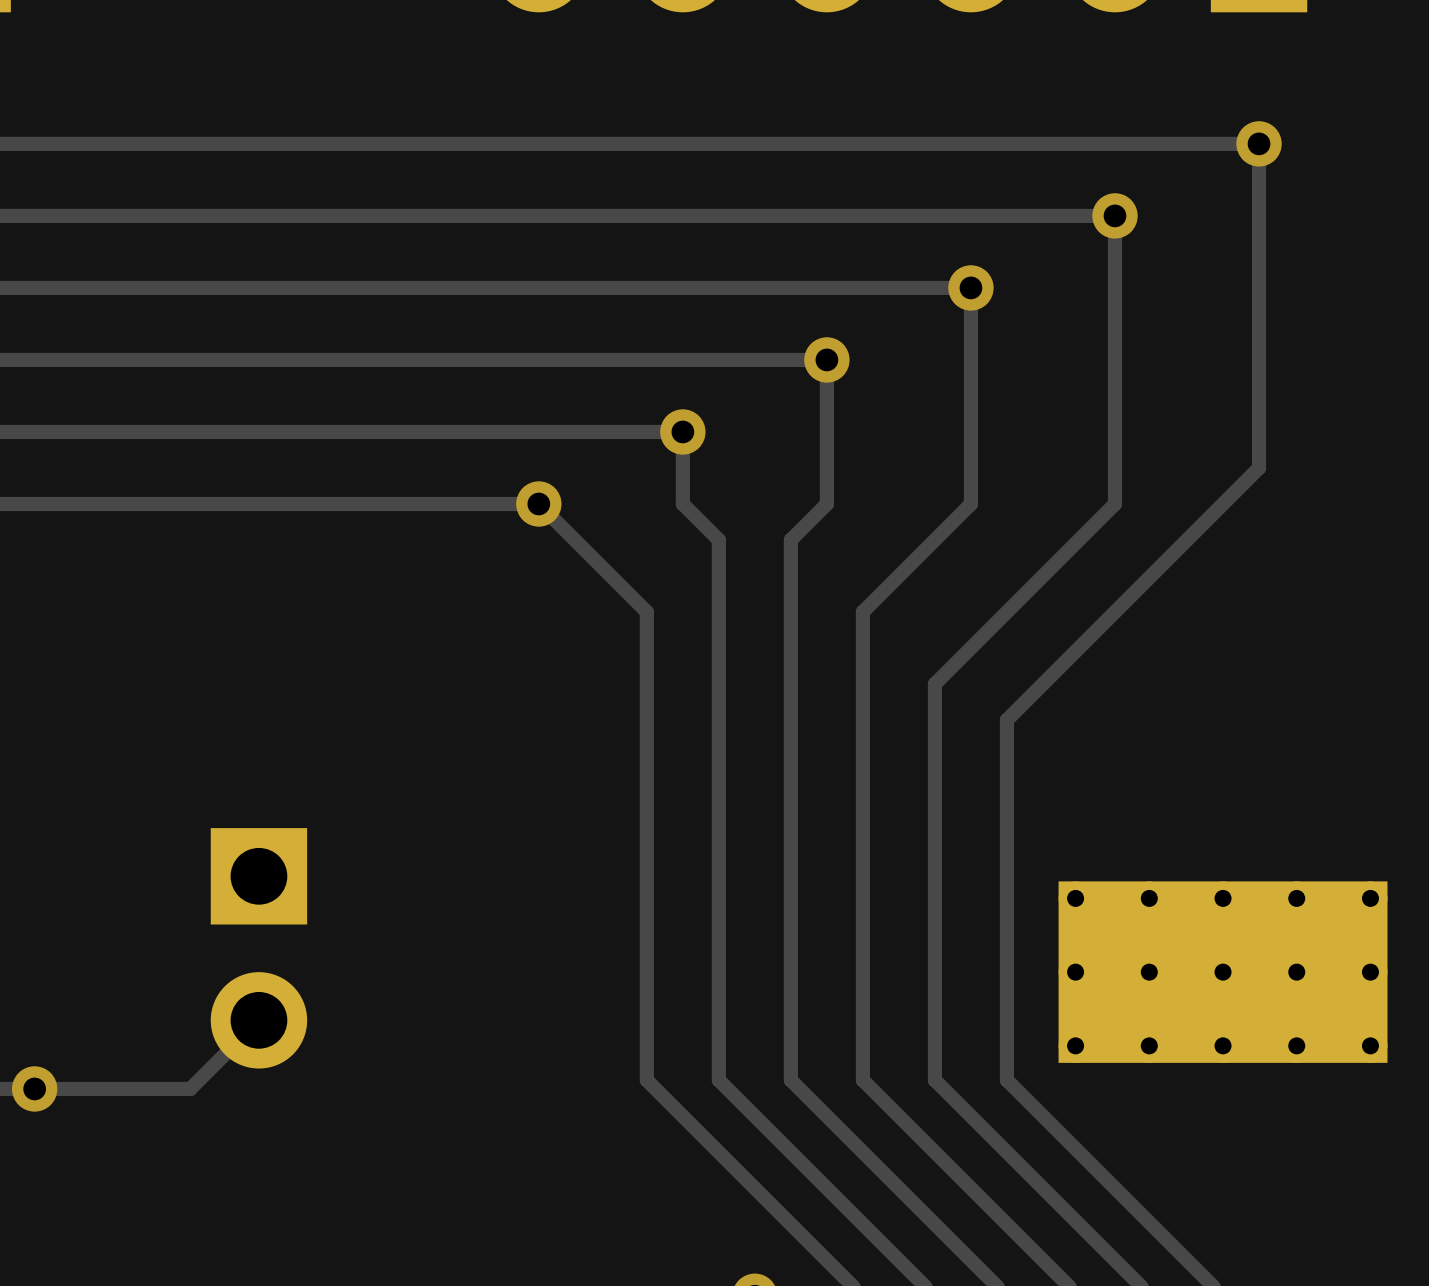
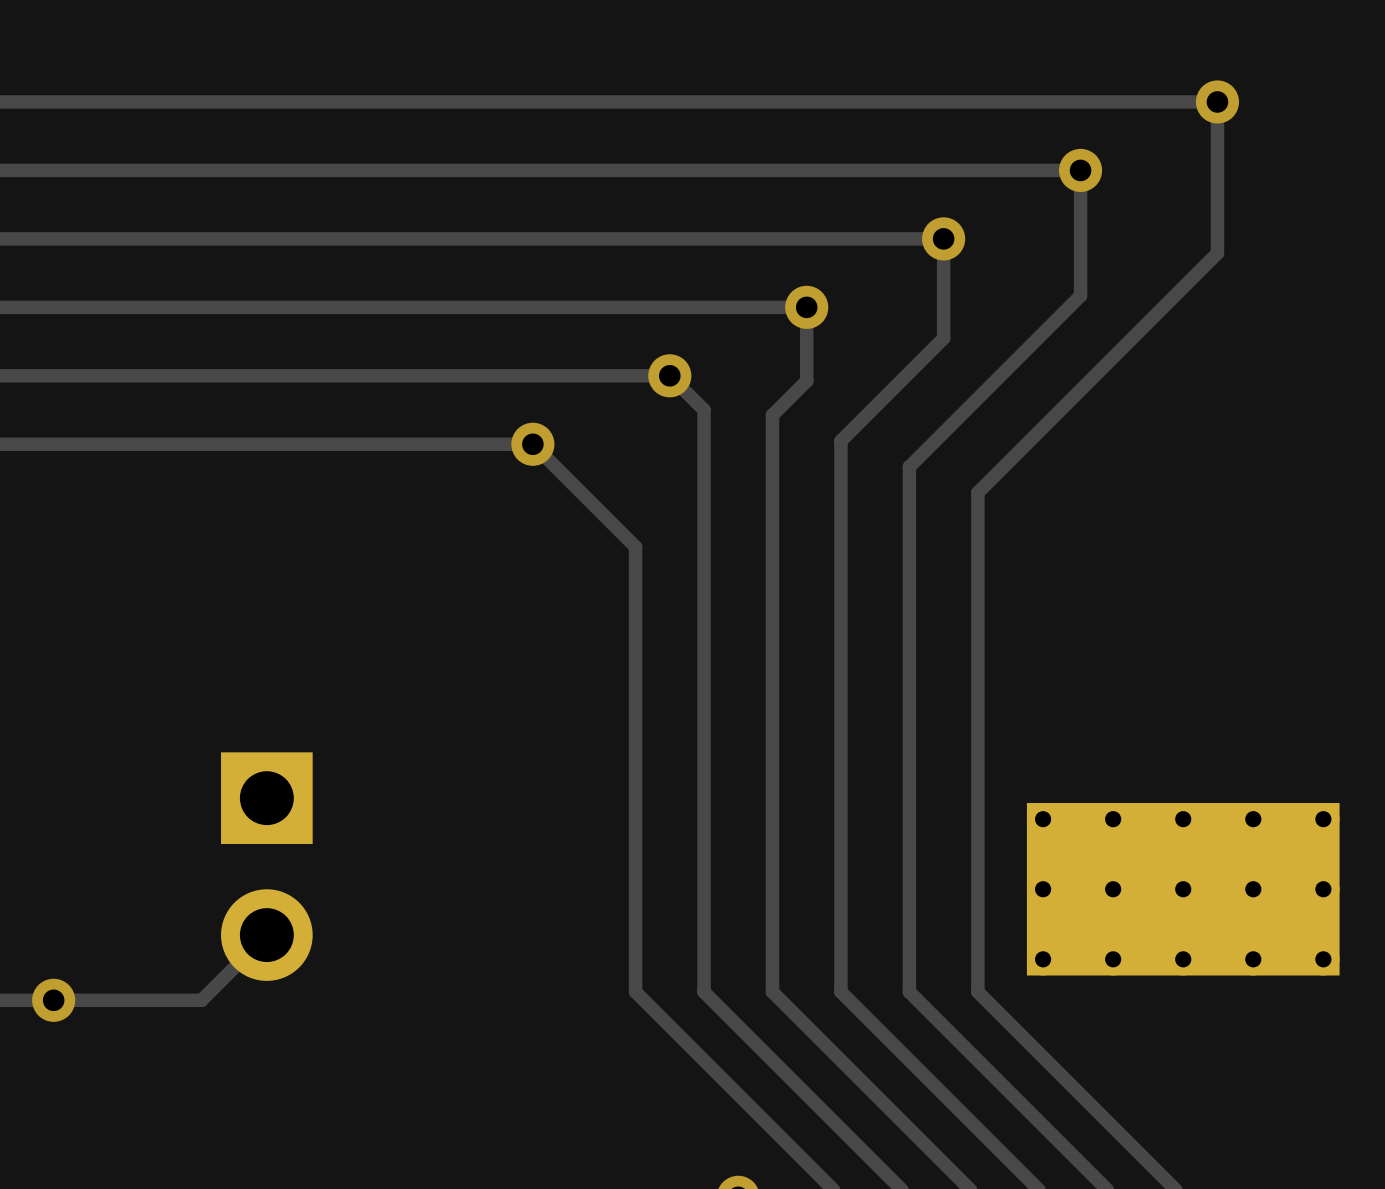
track: (1259, 302) (1259, 467) (1006, 720) -> (1217, 253) (977, 492) (977, 649)
track: (1114, 347) (1114, 503) (934, 684) -> (1080, 295) (909, 466) (909, 615)
track: (970, 392) (970, 503) (862, 612) -> (943, 338) (840, 441) (840, 546)
track: (682, 431) (682, 503) (718, 540) -> (669, 375) (704, 410) (704, 478)
track: (826, 437) (826, 503) (790, 540) -> (806, 380) (772, 415) (772, 478)

